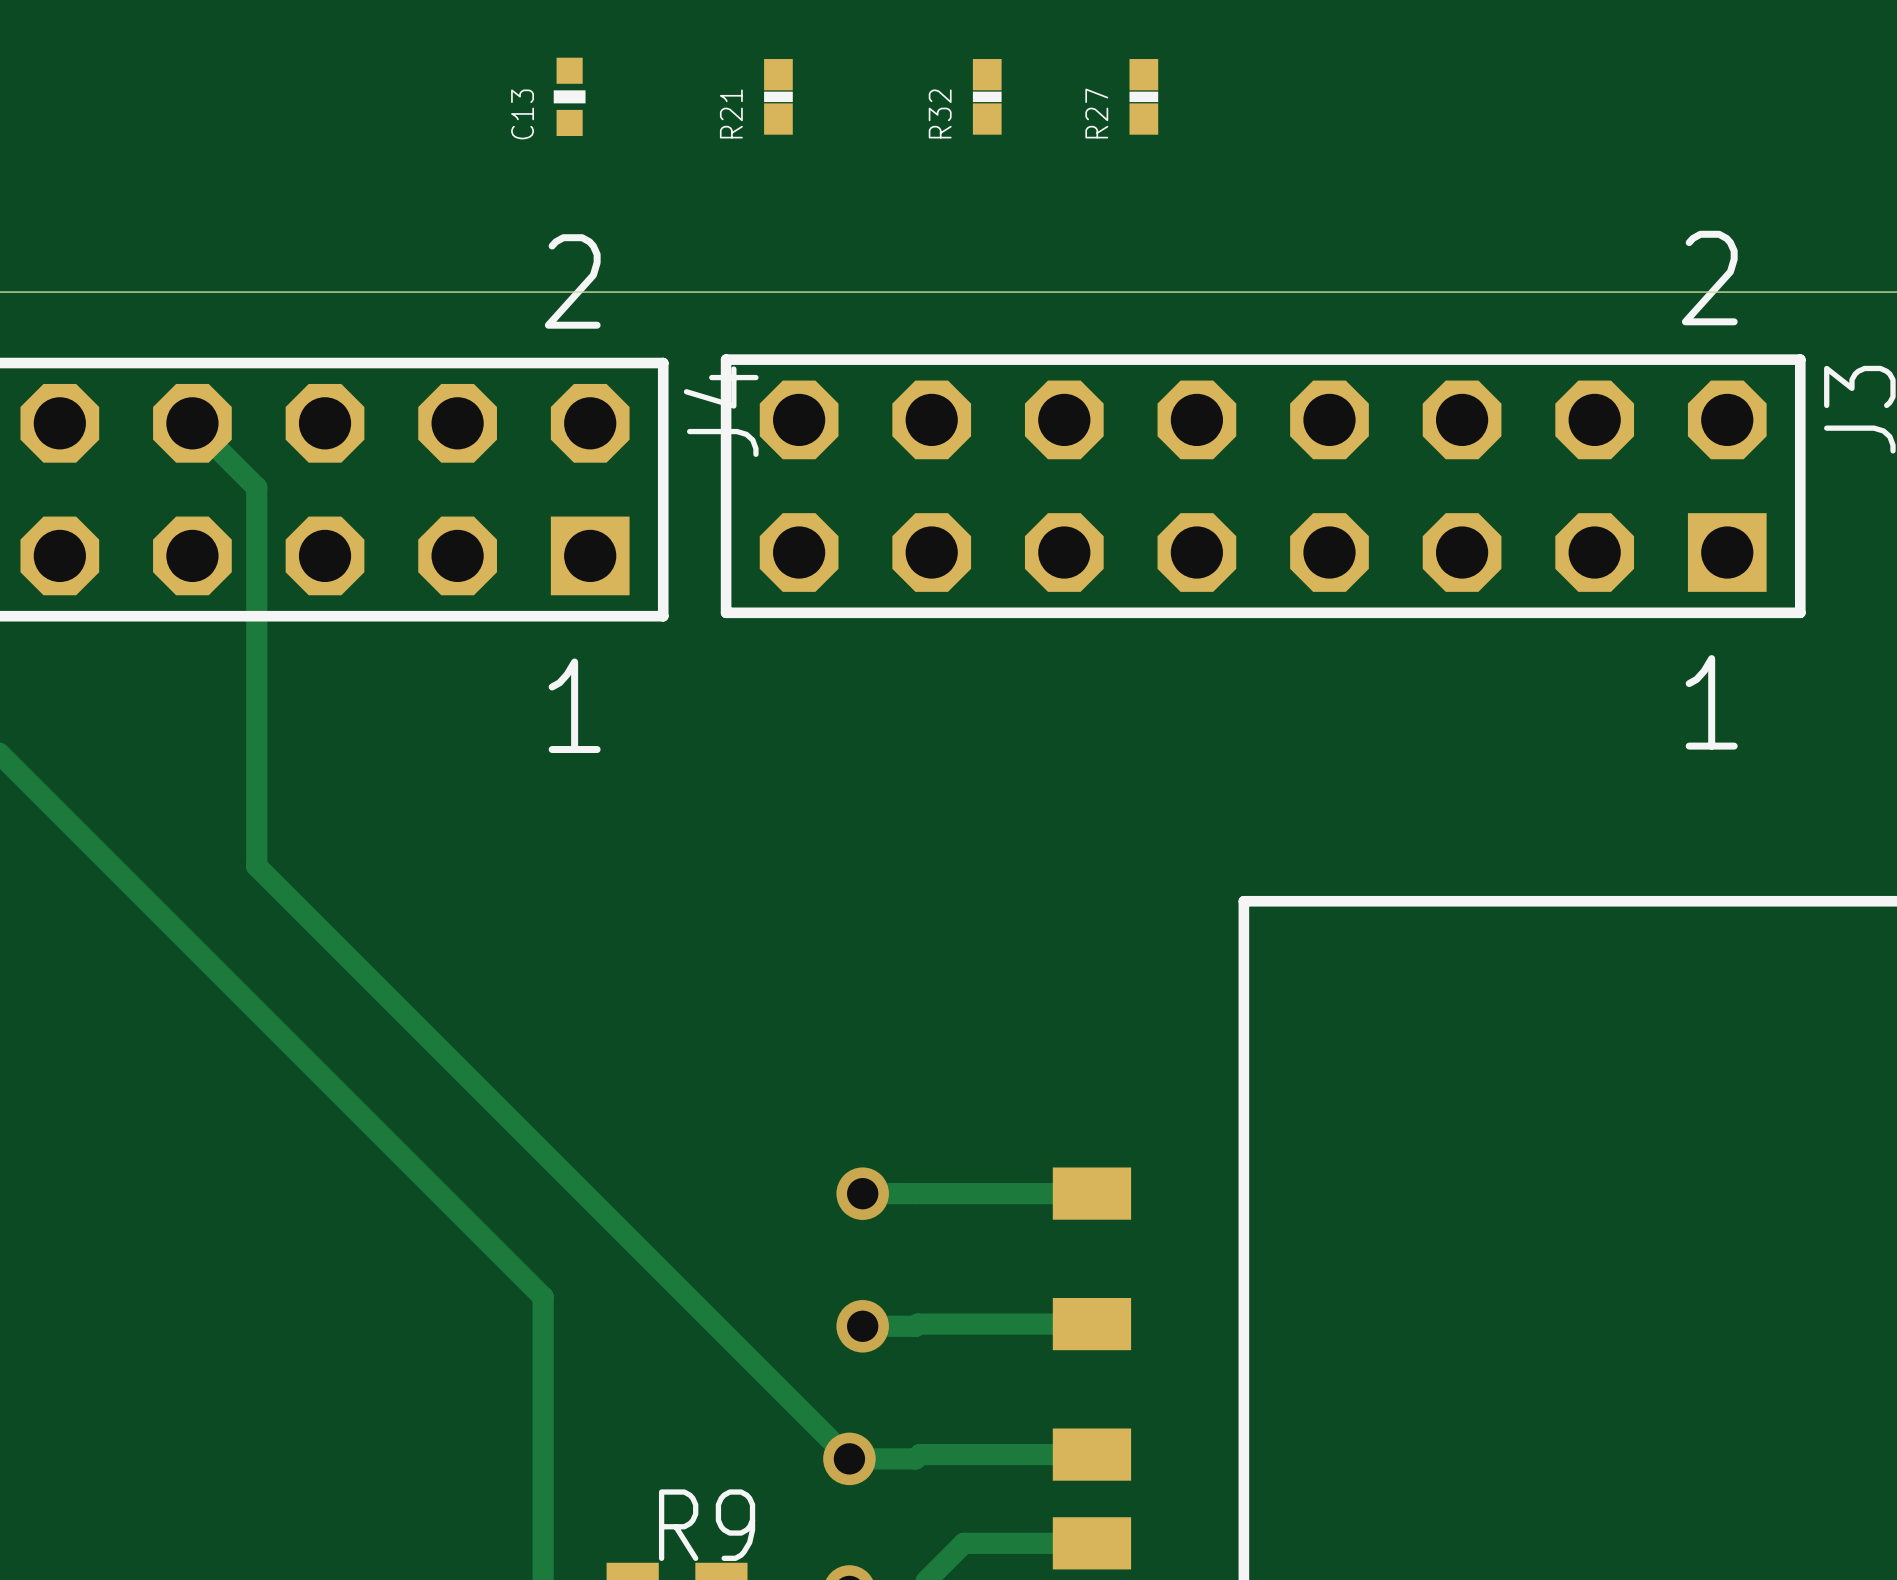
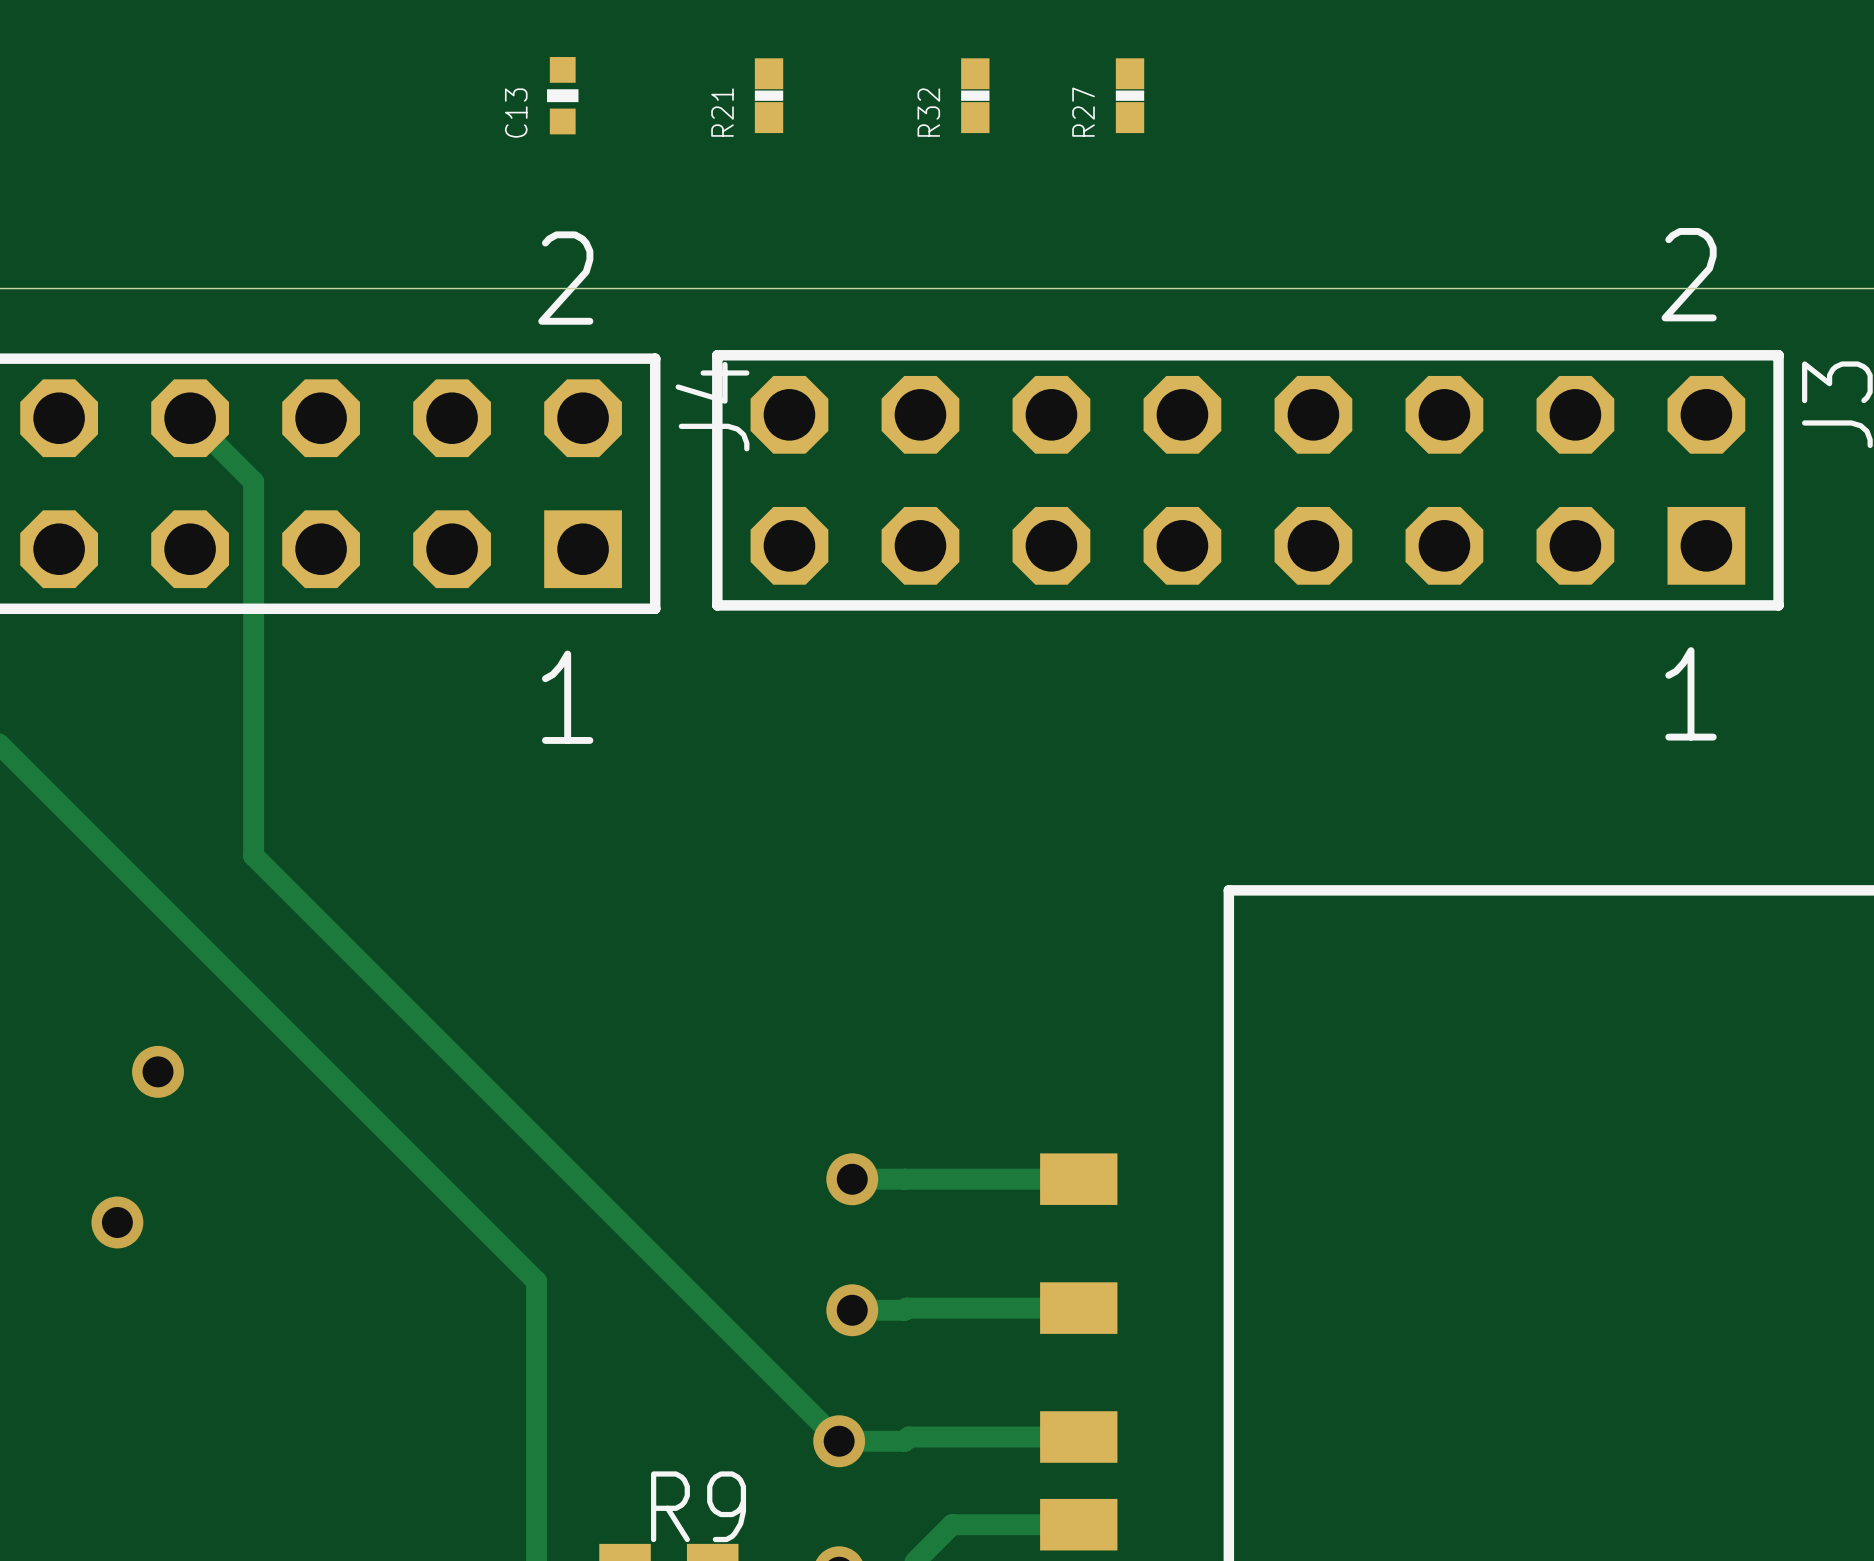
via: none -> (158, 1071)
via: none -> (117, 1222)

